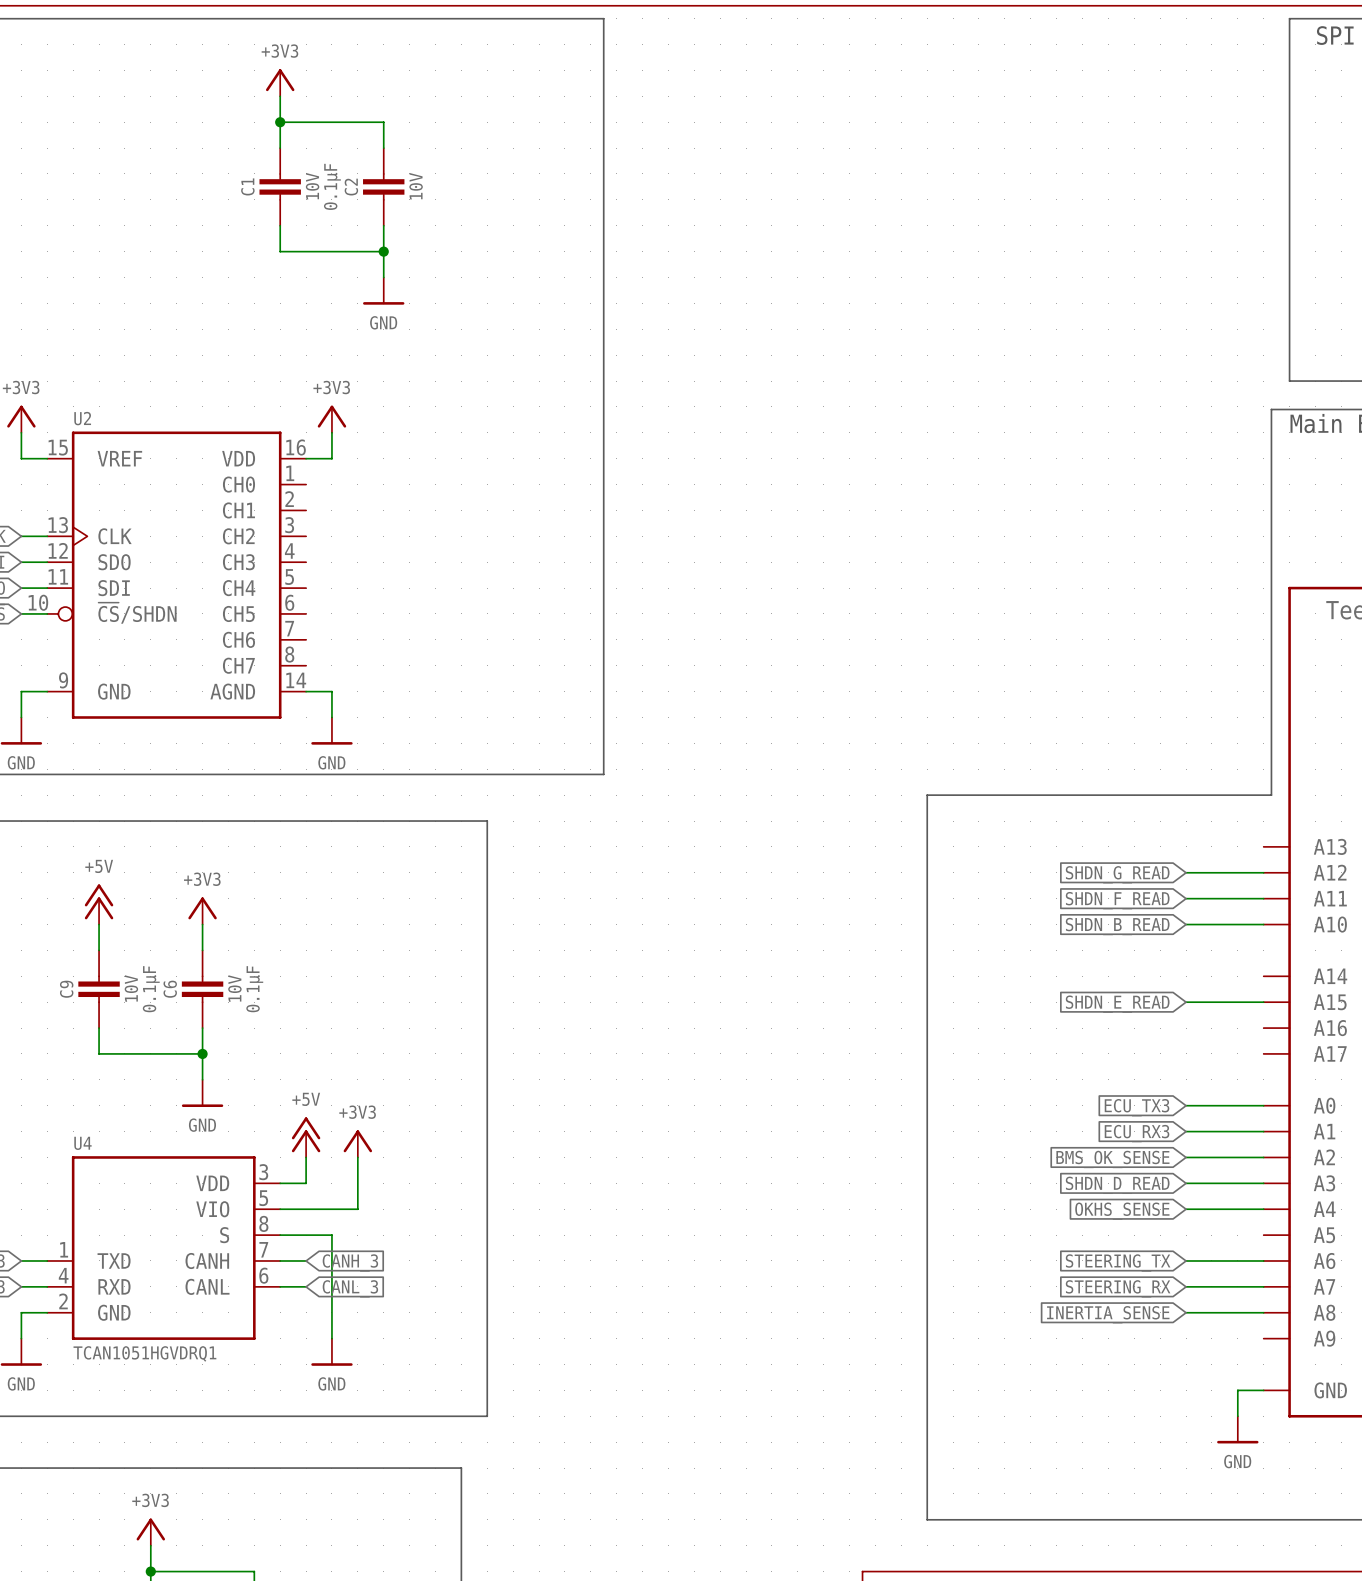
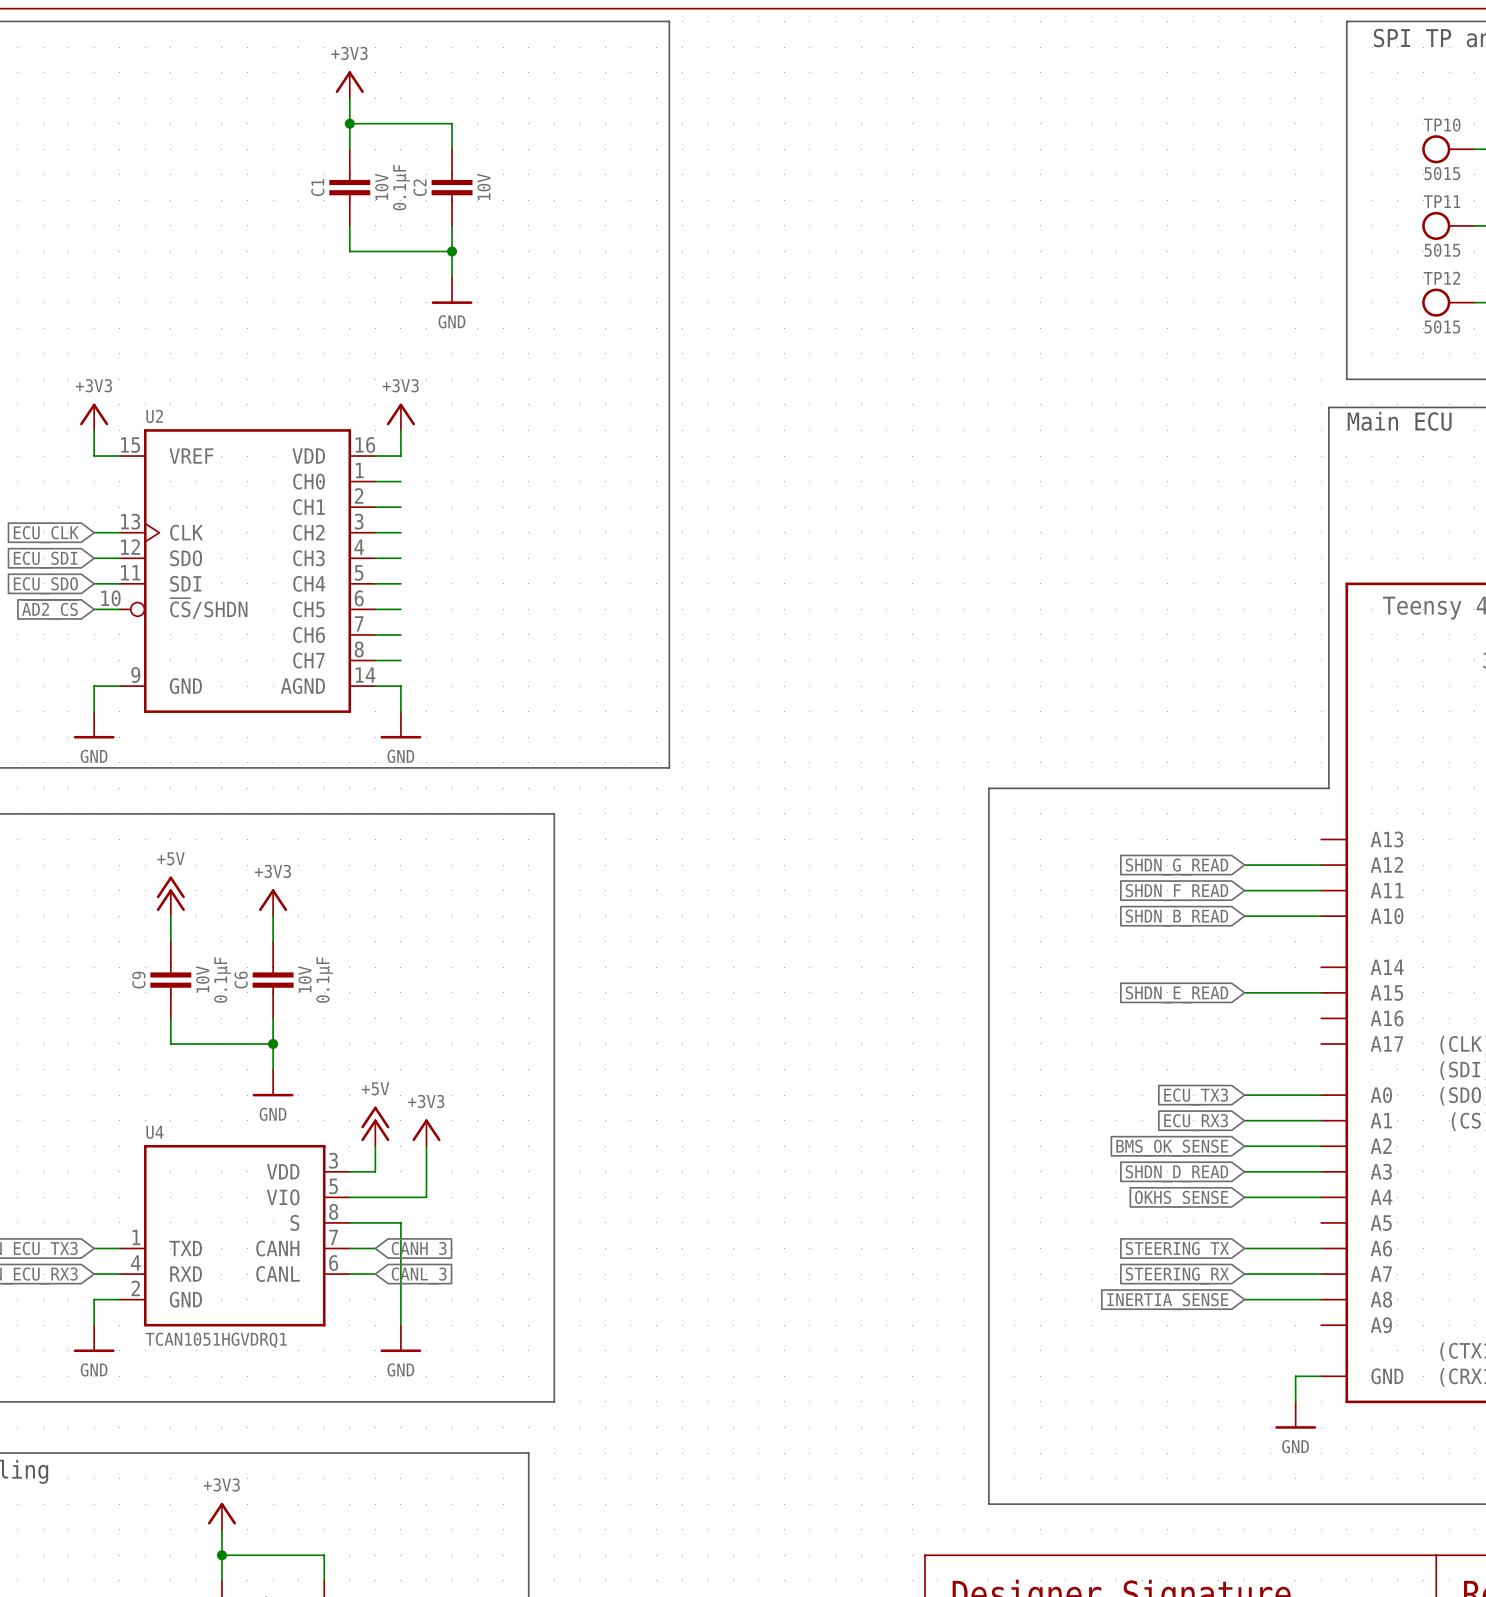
wire: none -> (375, 481) (400, 481)
wire: none -> (375, 507) (400, 507)
wire: none -> (375, 532) (400, 532)
wire: none -> (375, 558) (400, 558)
wire: none -> (375, 583) (400, 583)
wire: none -> (375, 609) (400, 609)
wire: none -> (375, 634) (400, 634)
wire: none -> (375, 660) (400, 660)

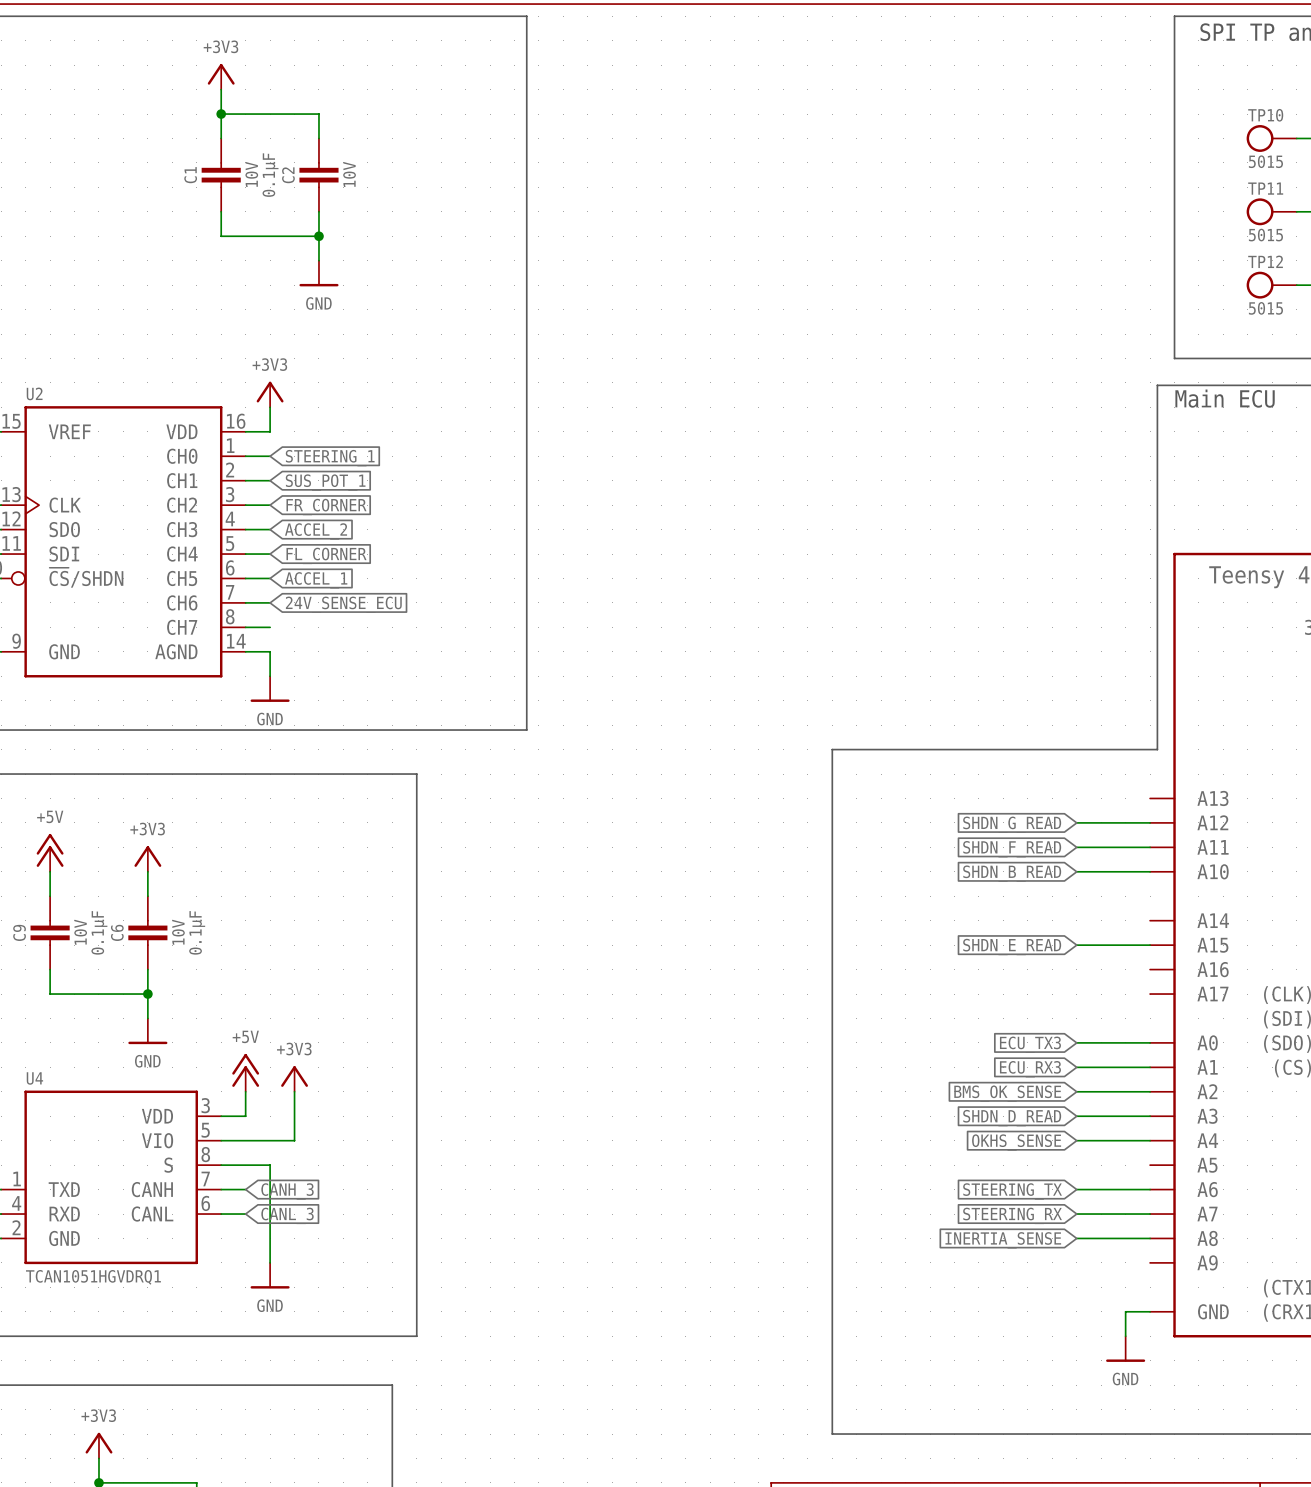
global label: none -> STEERING_1 (330, 458)
global label: none -> SUS_POT_1 (325, 482)
global label: none -> FR_CORNER (326, 507)
global label: none -> ACCEL_2 (316, 531)
global label: none -> FL_CORNER (326, 555)
global label: none -> ACCEL_1 (316, 580)
global label: none -> 24V_SENSE_ECU (343, 604)

